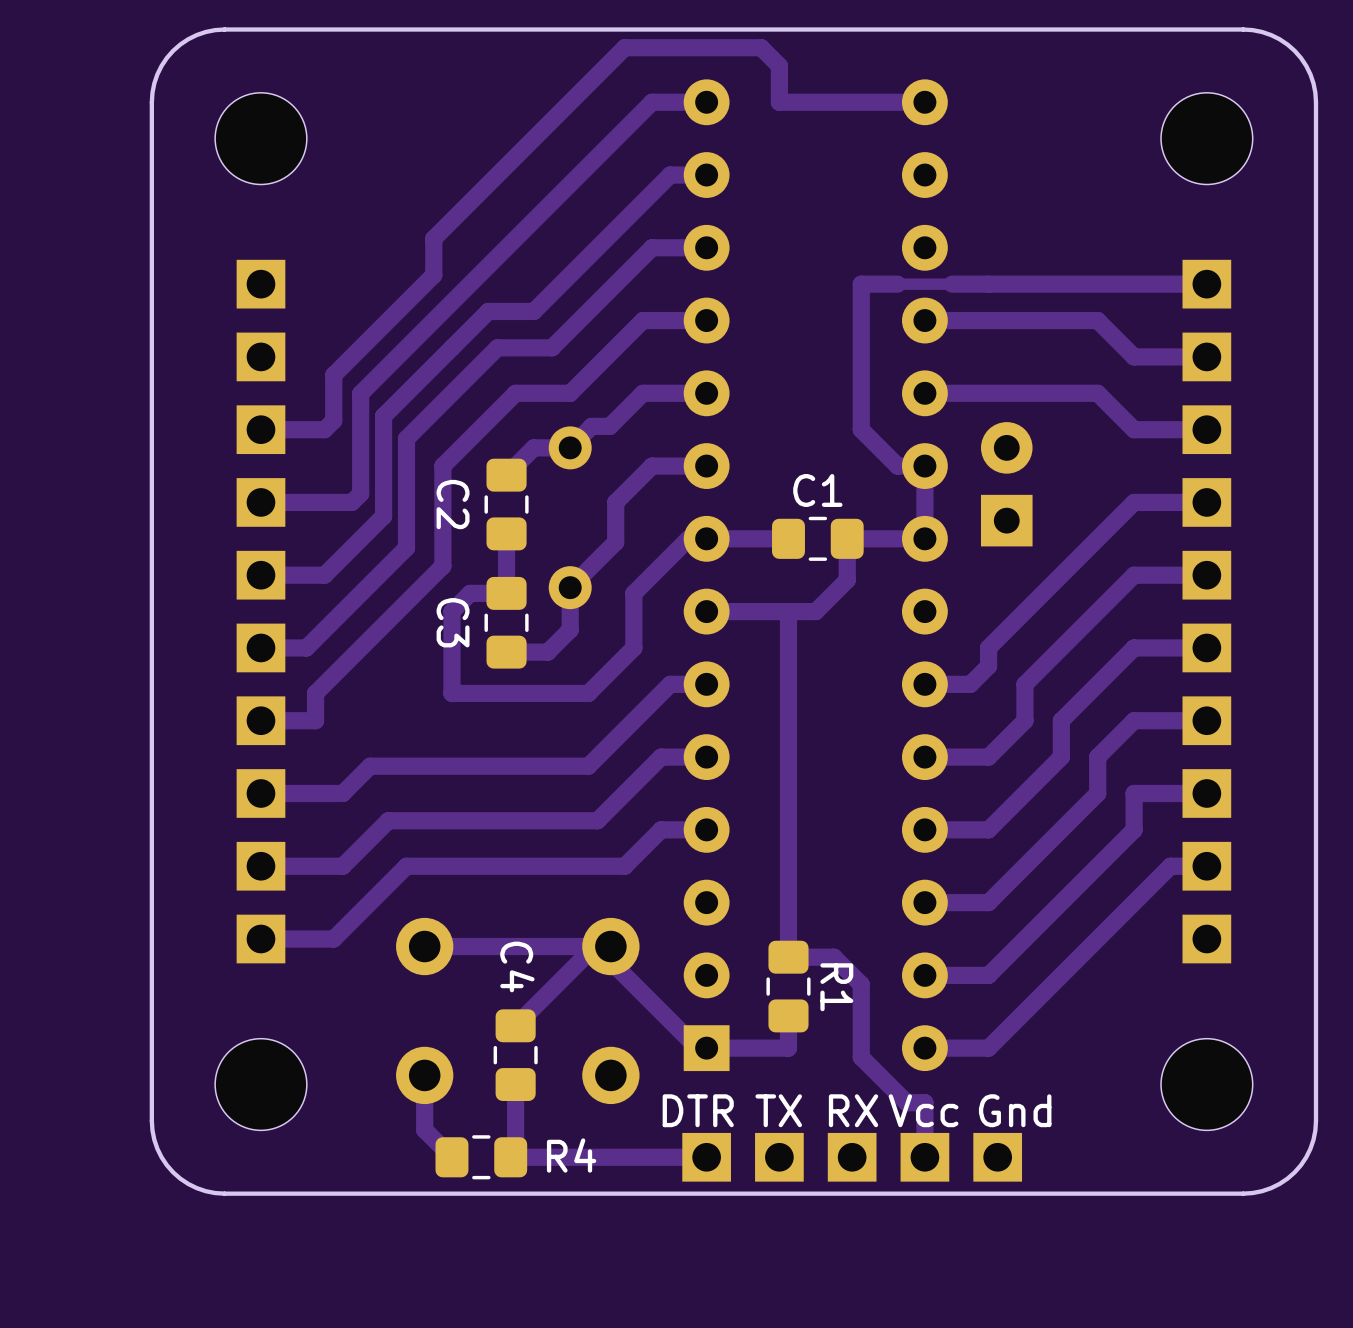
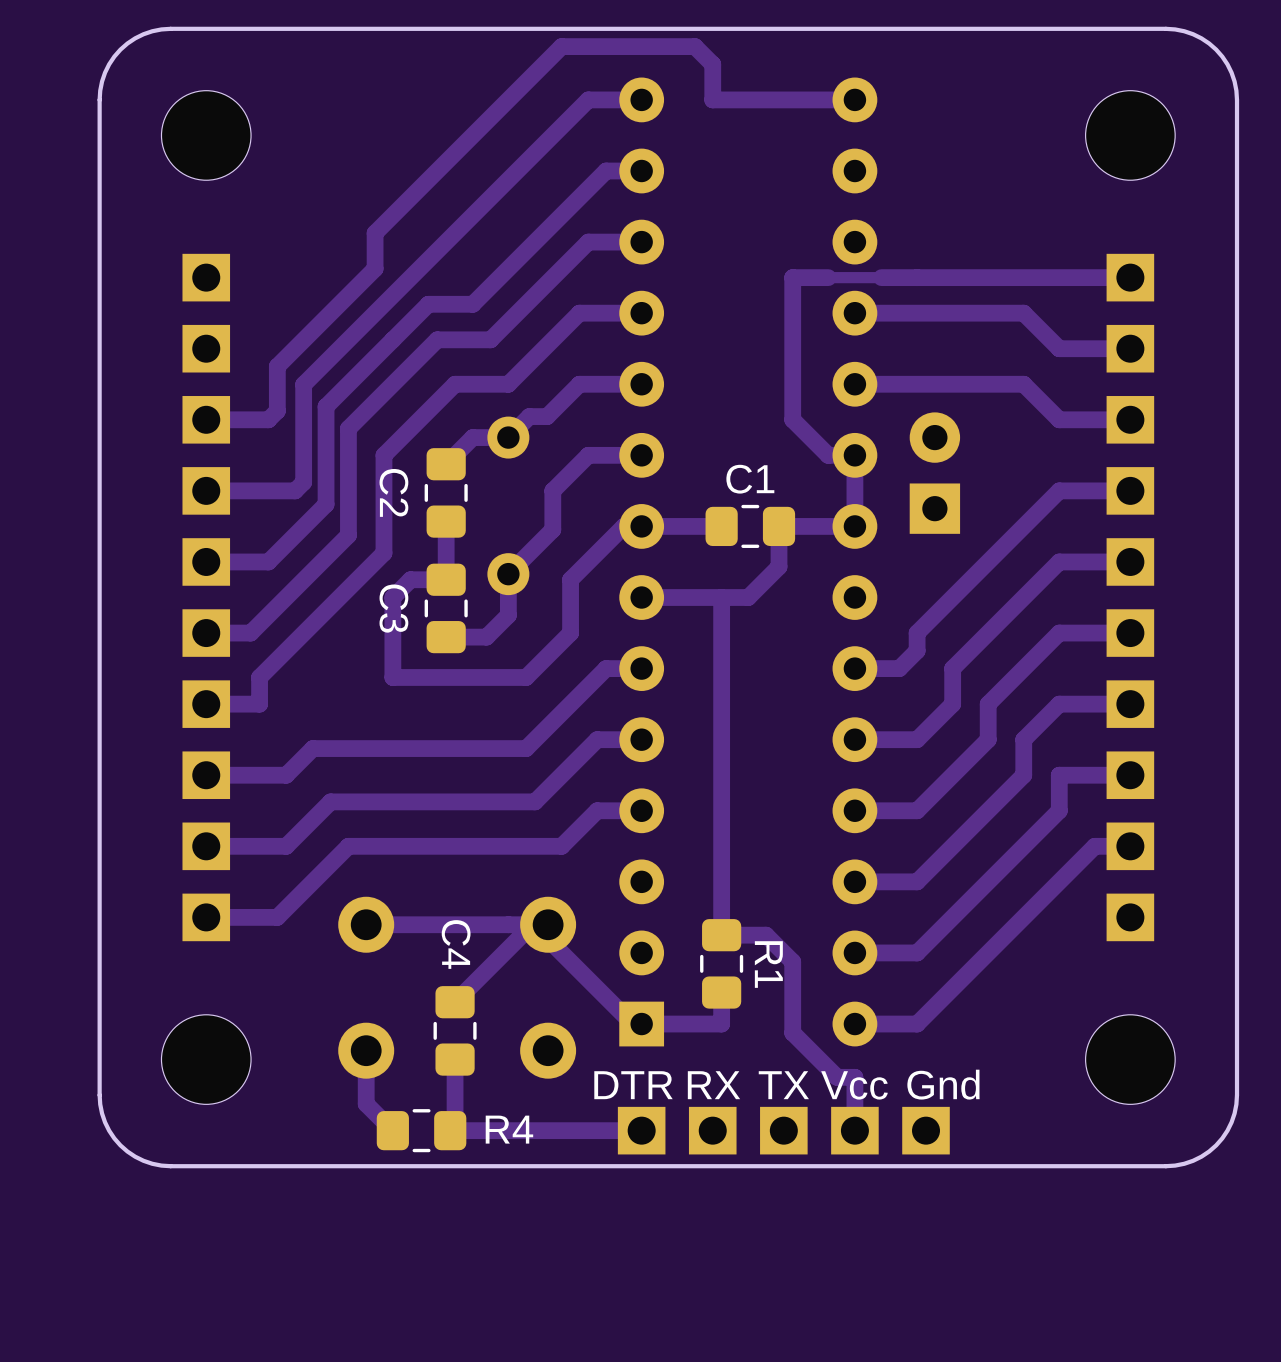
text: TX (778, 1110) -> RX (713, 1085)
text: RX (853, 1110) -> TX (783, 1085)

